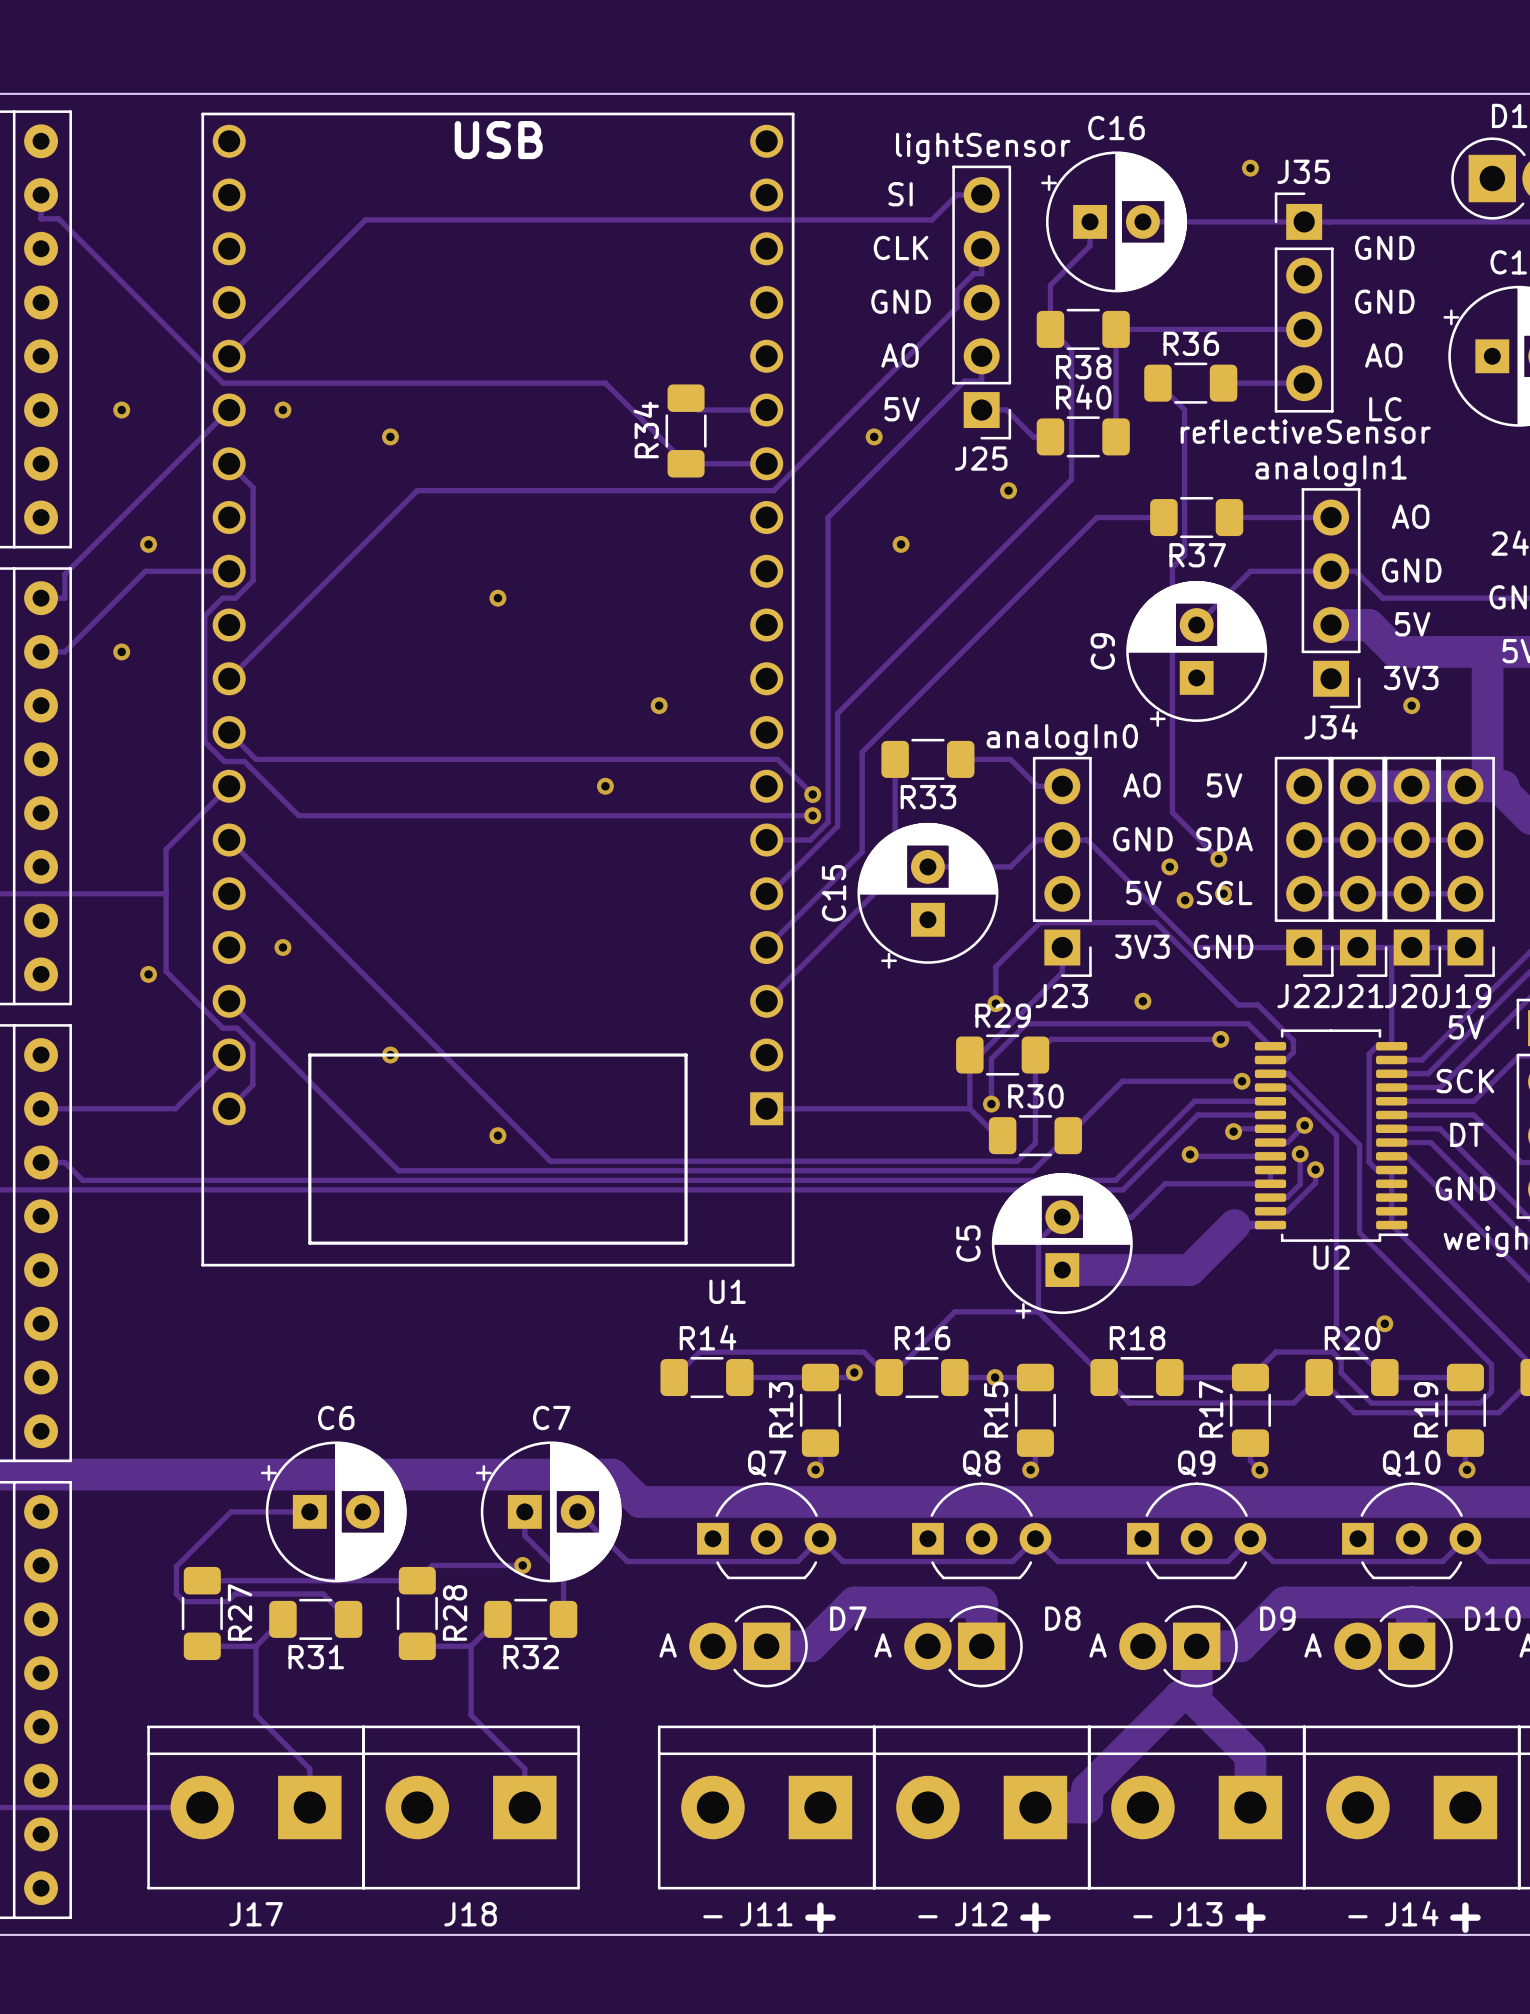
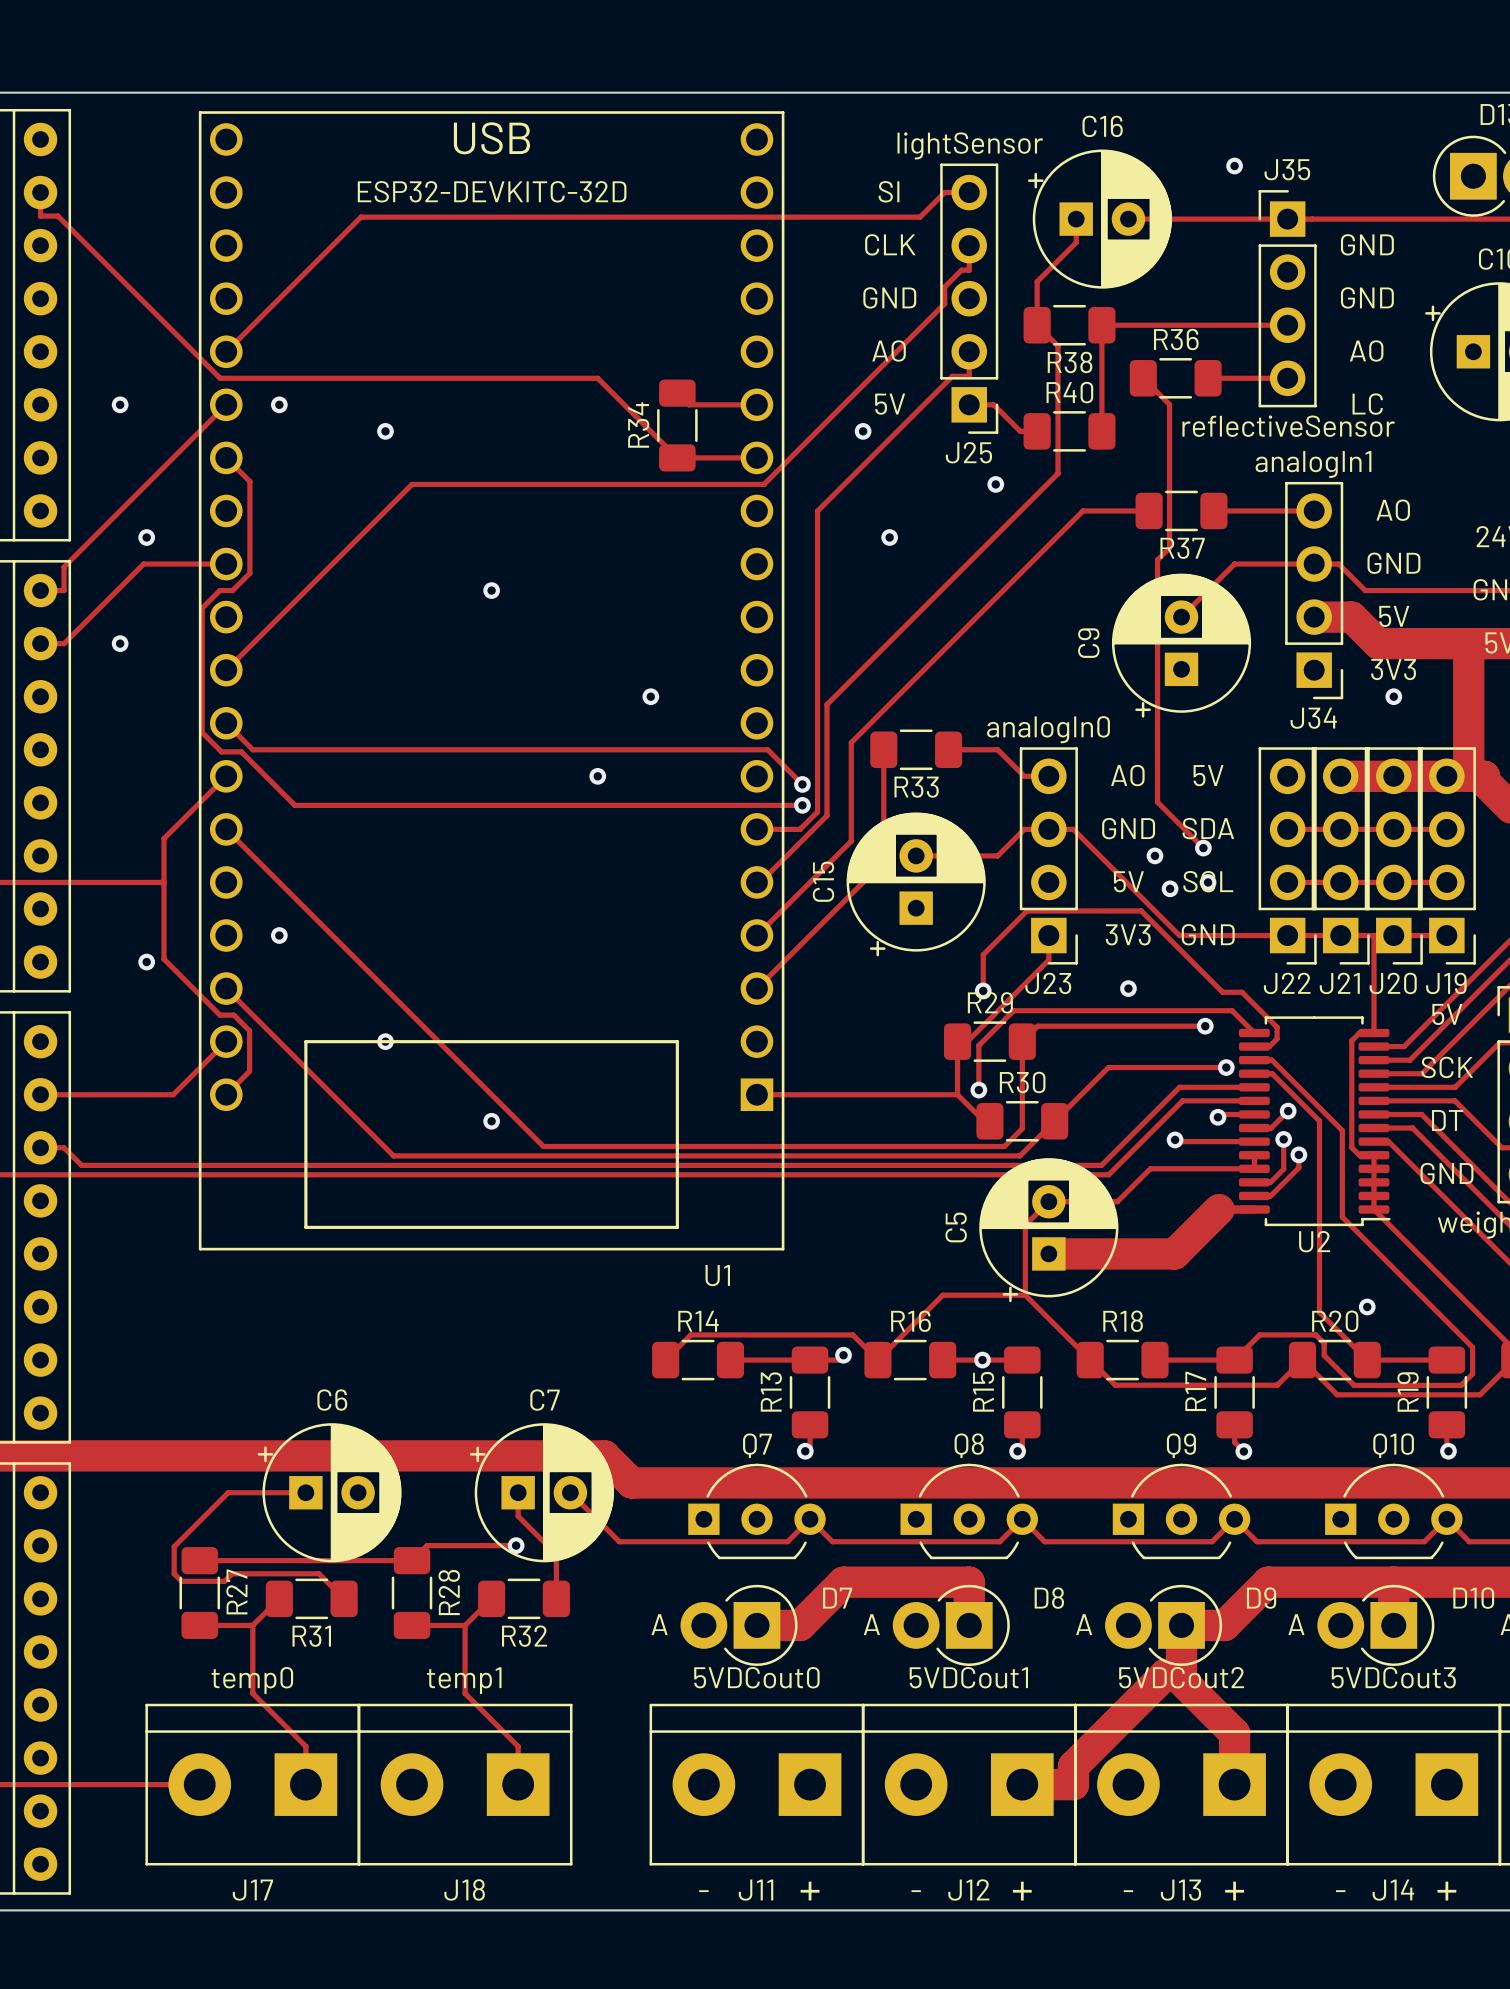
U1 value: none -> ESP32-DEVKITC-32D (492, 191)
J11 value: none -> 5VDCout0 (756, 1677)
J12 value: none -> 5VDCout1 (968, 1677)
J13 value: none -> 5VDCout2 (1181, 1677)
J14 value: none -> 5VDCout3 (1393, 1677)
J17 value: none -> temp0 (252, 1680)
J18 value: none -> temp1 (464, 1680)

